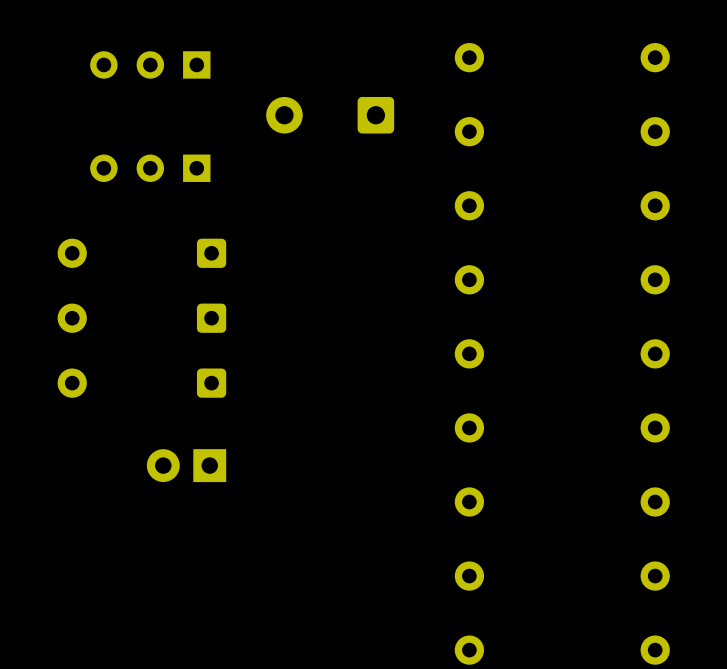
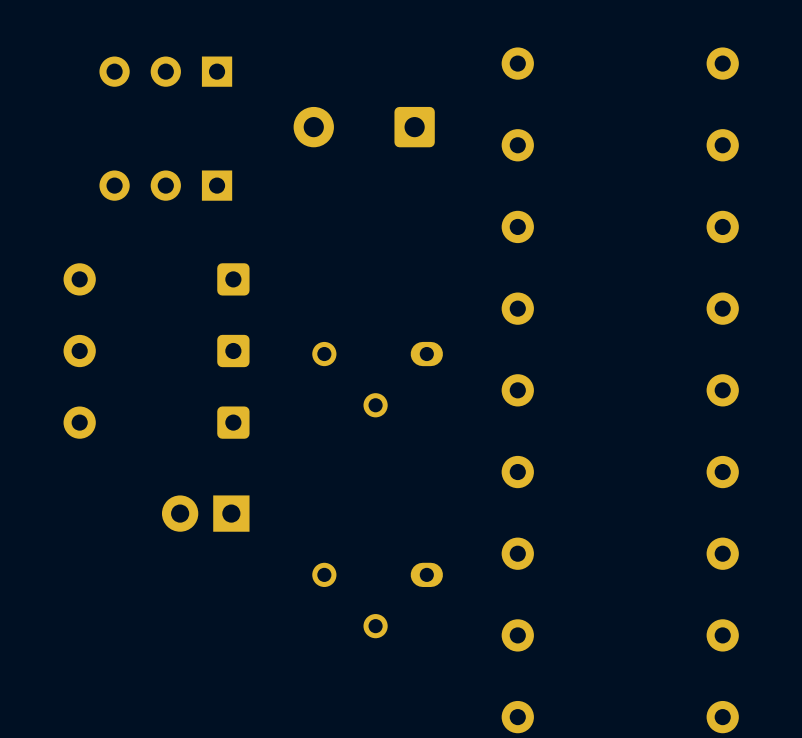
part: none -> (377, 379)
part: none -> (377, 600)

